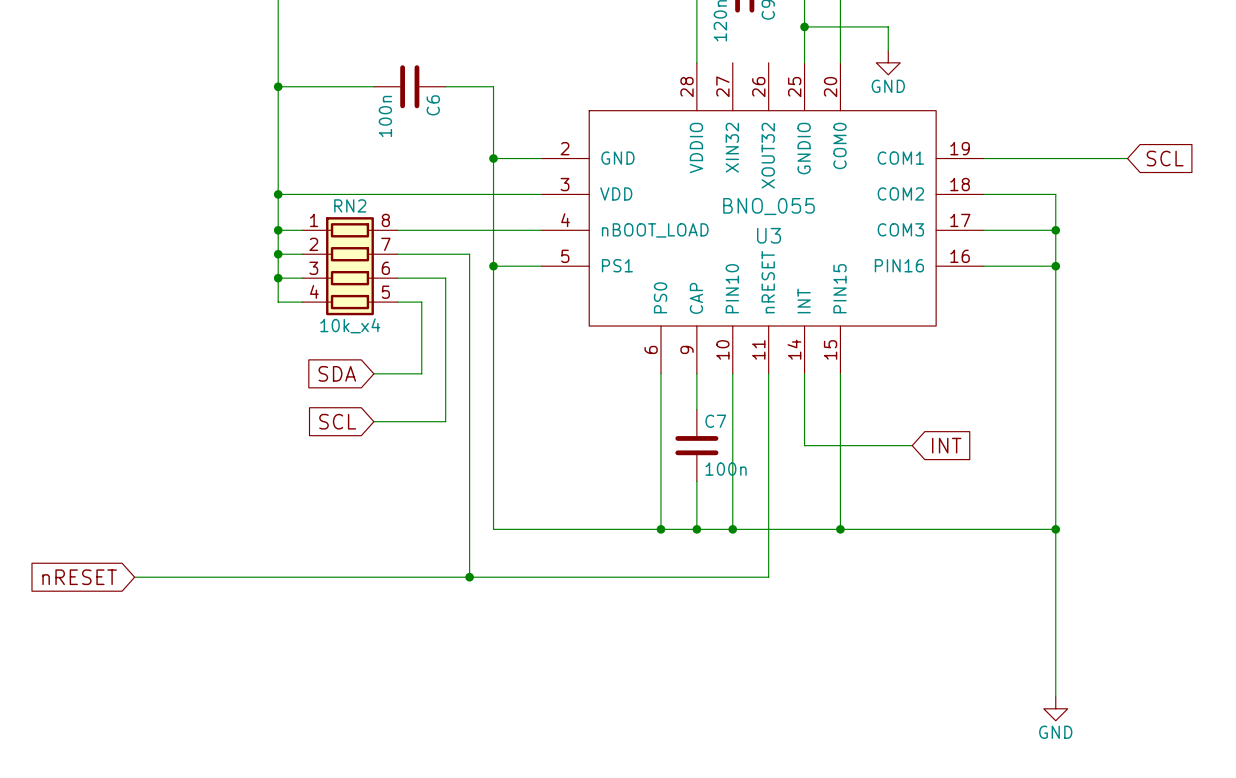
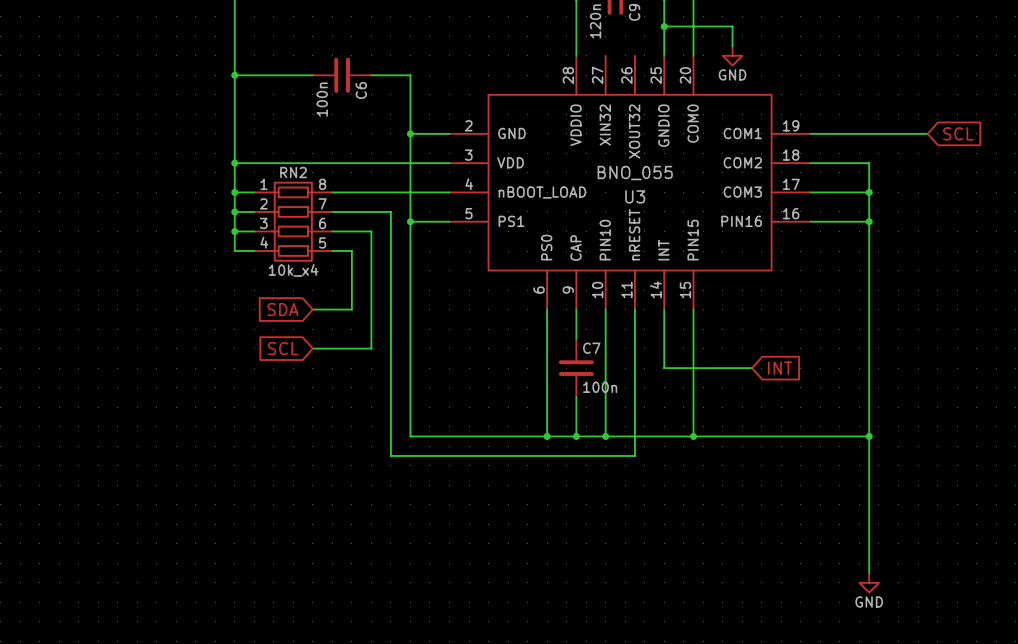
wire: (469, 553) (469, 577) -> (390, 455) (634, 455)
wire: (768, 553) (768, 577) (134, 577) -> none
global label: nRESET (79, 577) -> none
junction: (469, 577) -> none

